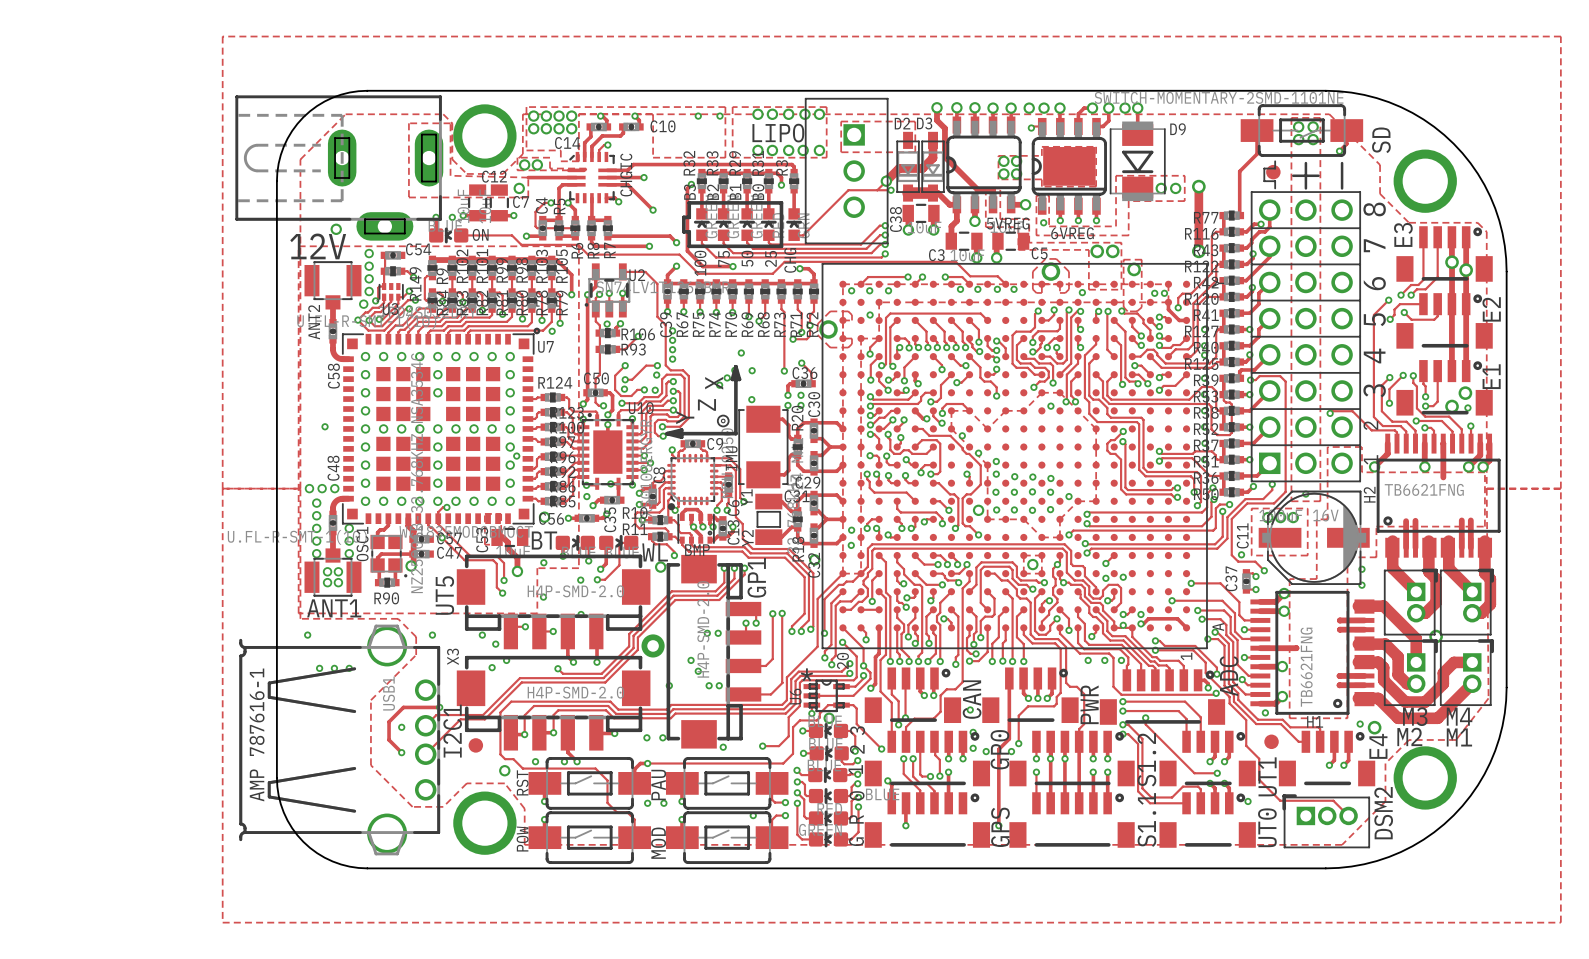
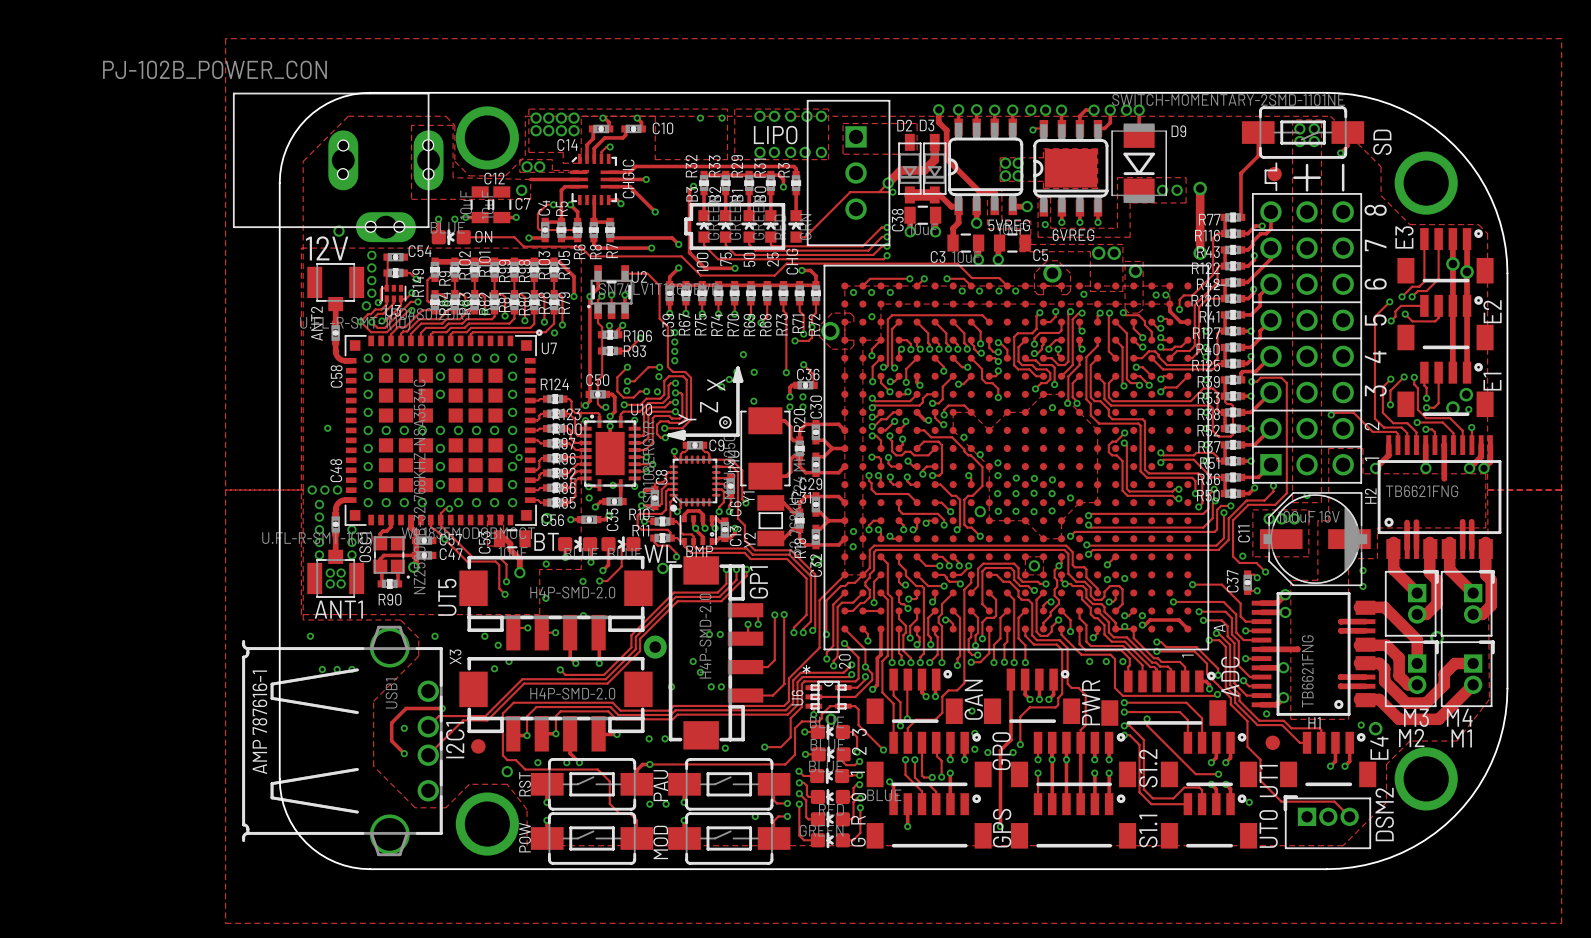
12V value: none -> PJ-102B_POWER_CON (214, 69)
12V footprint: [235, 95, 444, 241] -> [232, 92, 444, 243]

